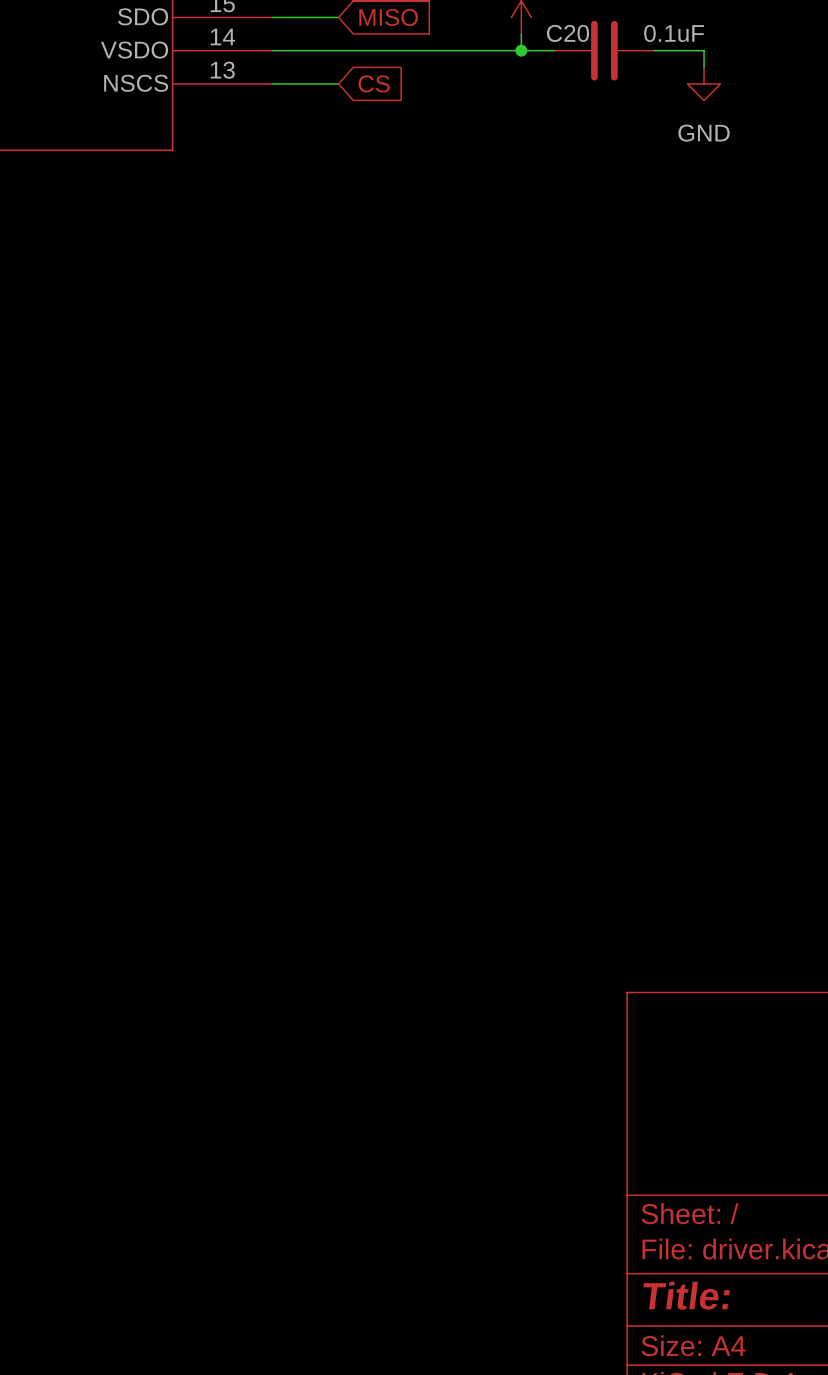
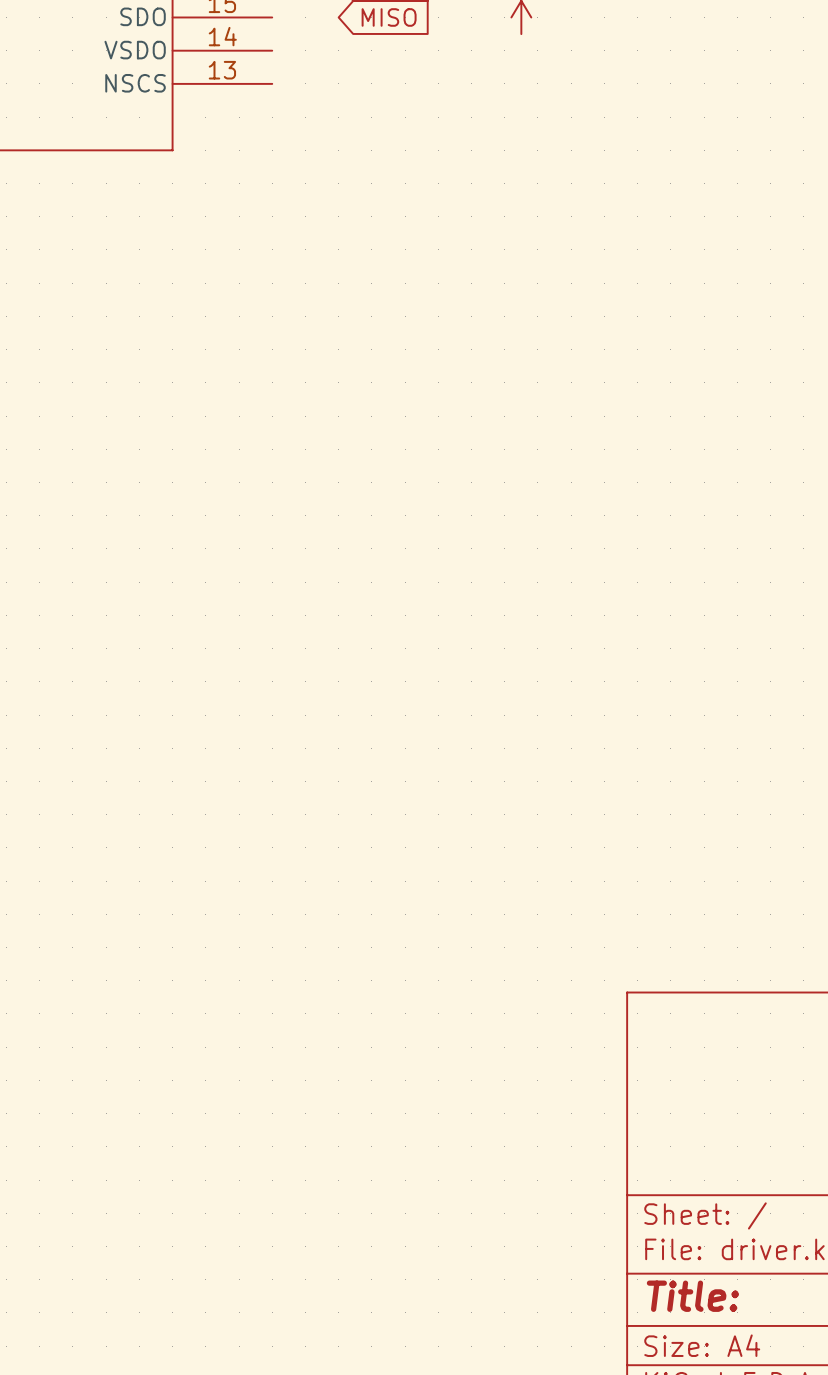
wire: (272, 17) (338, 17) -> none
wire: (521, 34) (521, 50) -> none
wire: (272, 50) (554, 50) -> none
junction: (521, 50) -> none
C20: 0.1uF (604, 50) -> none
wire: (654, 50) (704, 50) (704, 67) -> none
wire: (272, 83) (338, 83) -> none
global label: CS (374, 83) -> none
power symbol: GND (704, 83) -> none

